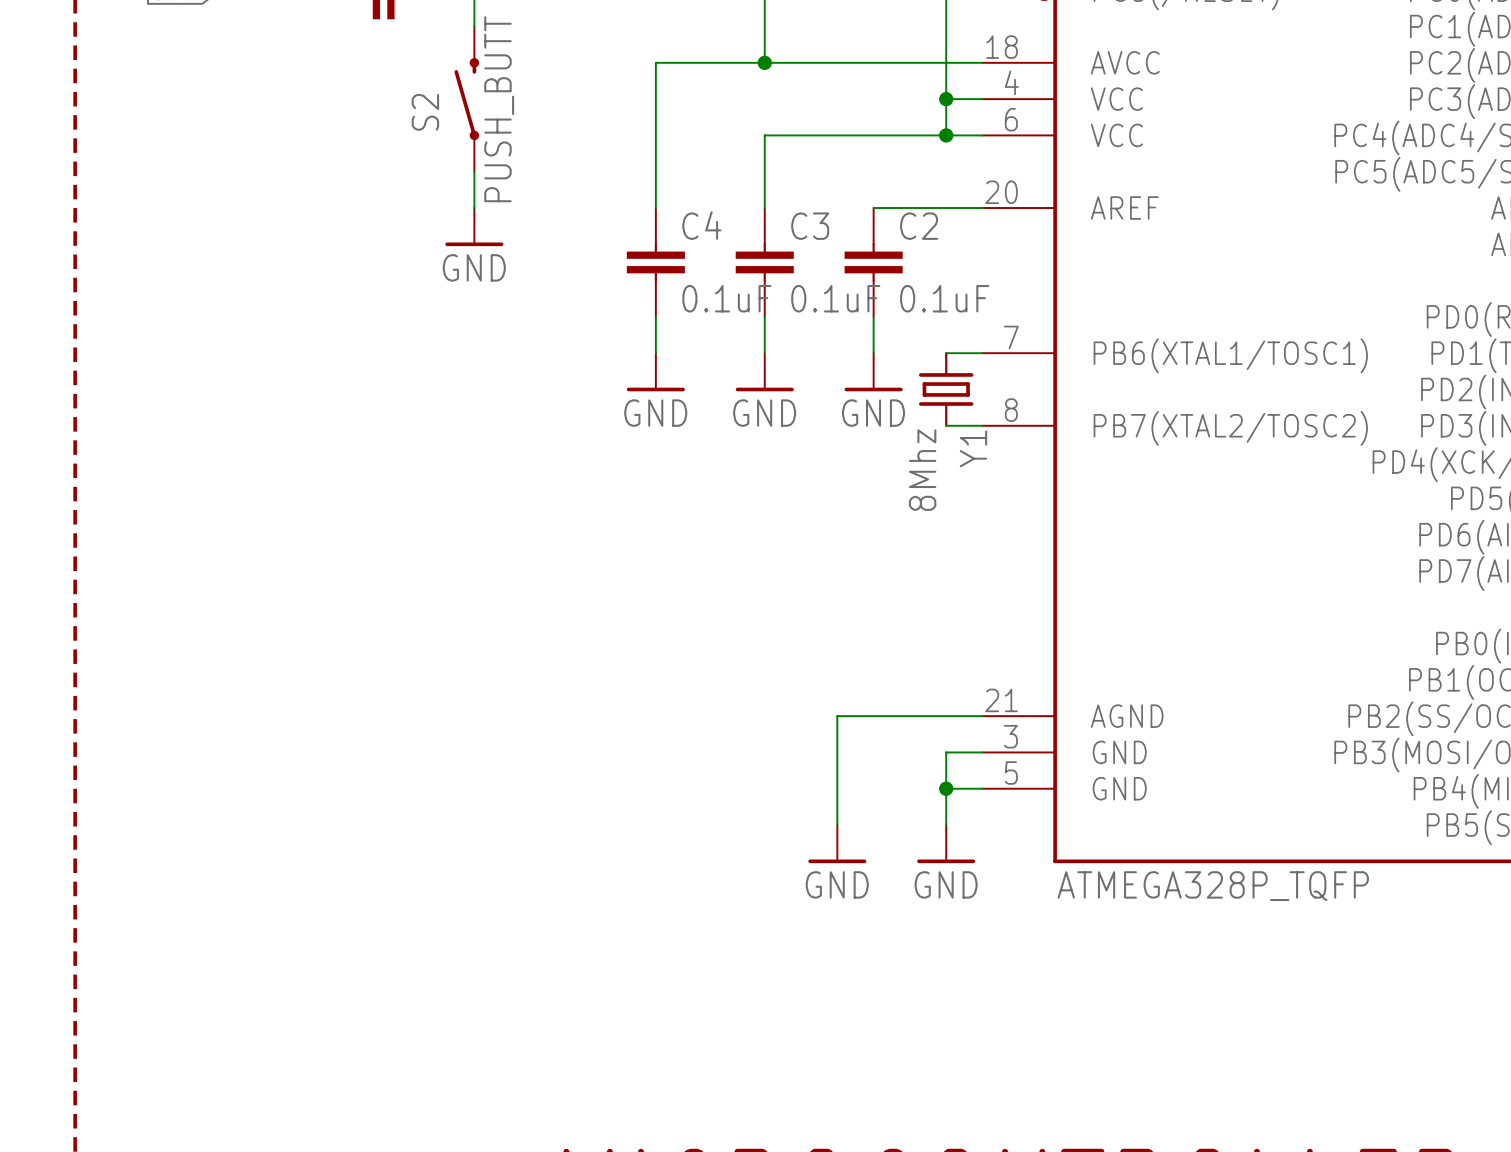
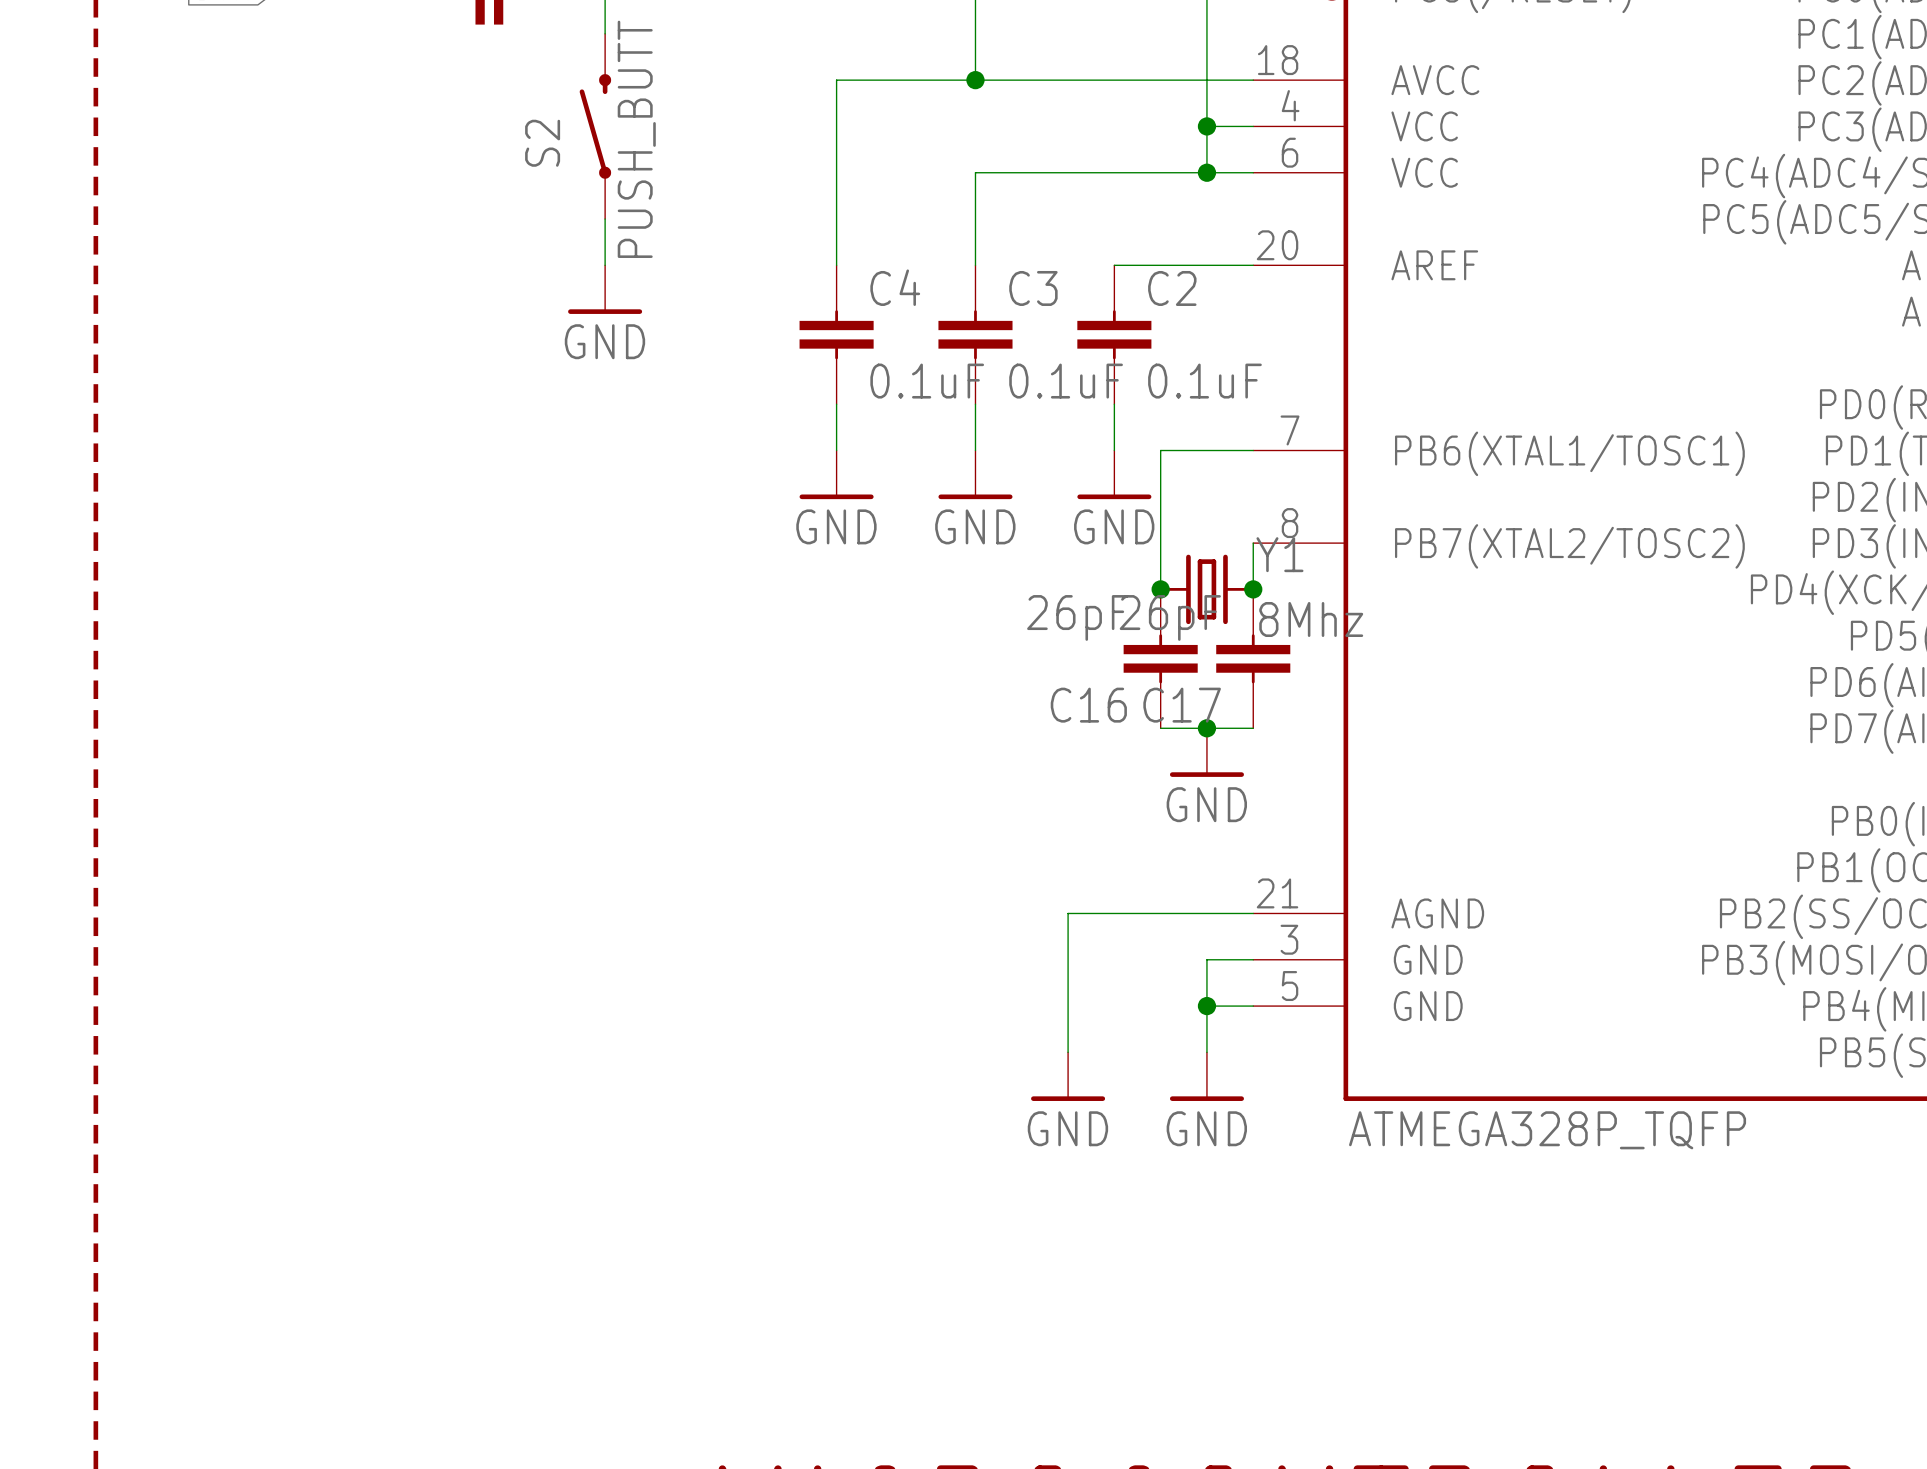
wire: none -> (1206, 450) (1160, 450) (1160, 589)
Y1 rotation: 0° (946, 389) -> 90° clockwise (1206, 589)
Y1 position: (946, 389) -> (1206, 589)
wire: (946, 425) (982, 425) -> (1253, 589) (1253, 543)
Y1 name position: Y1 (973, 448) -> Y1 (1279, 554)
junction: none -> (1160, 589)
junction: none -> (1253, 589)
Y1 value position: 8Mhz (922, 470) -> 8Mhz (1311, 619)
C16: none -> 26pF (1160, 658)
C17: none -> 26pF (1253, 658)
wire: none -> (1160, 728) (1253, 728)
junction: none -> (1206, 728)
power symbol: none -> GND (1206, 752)

